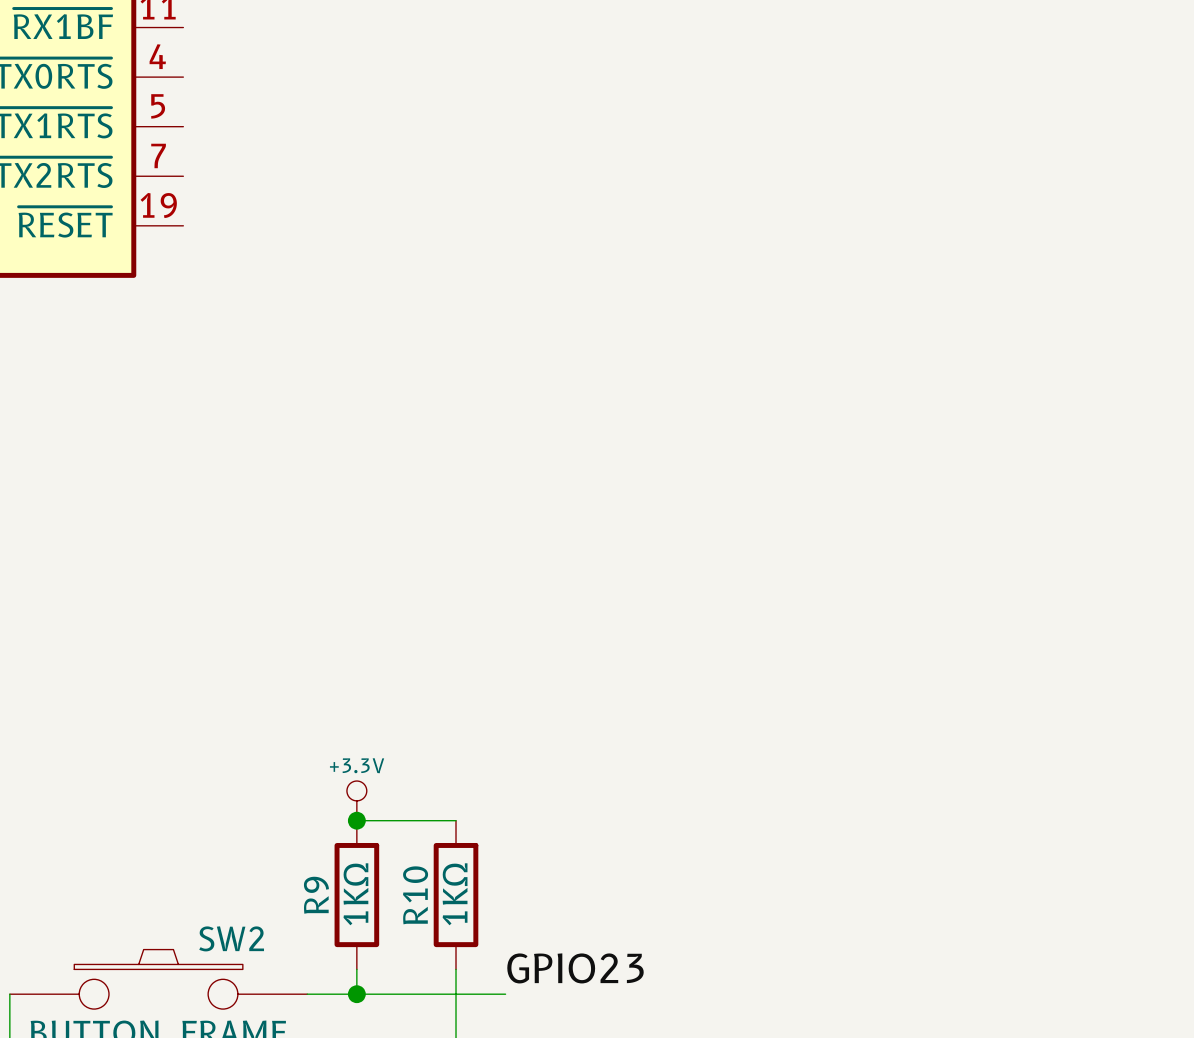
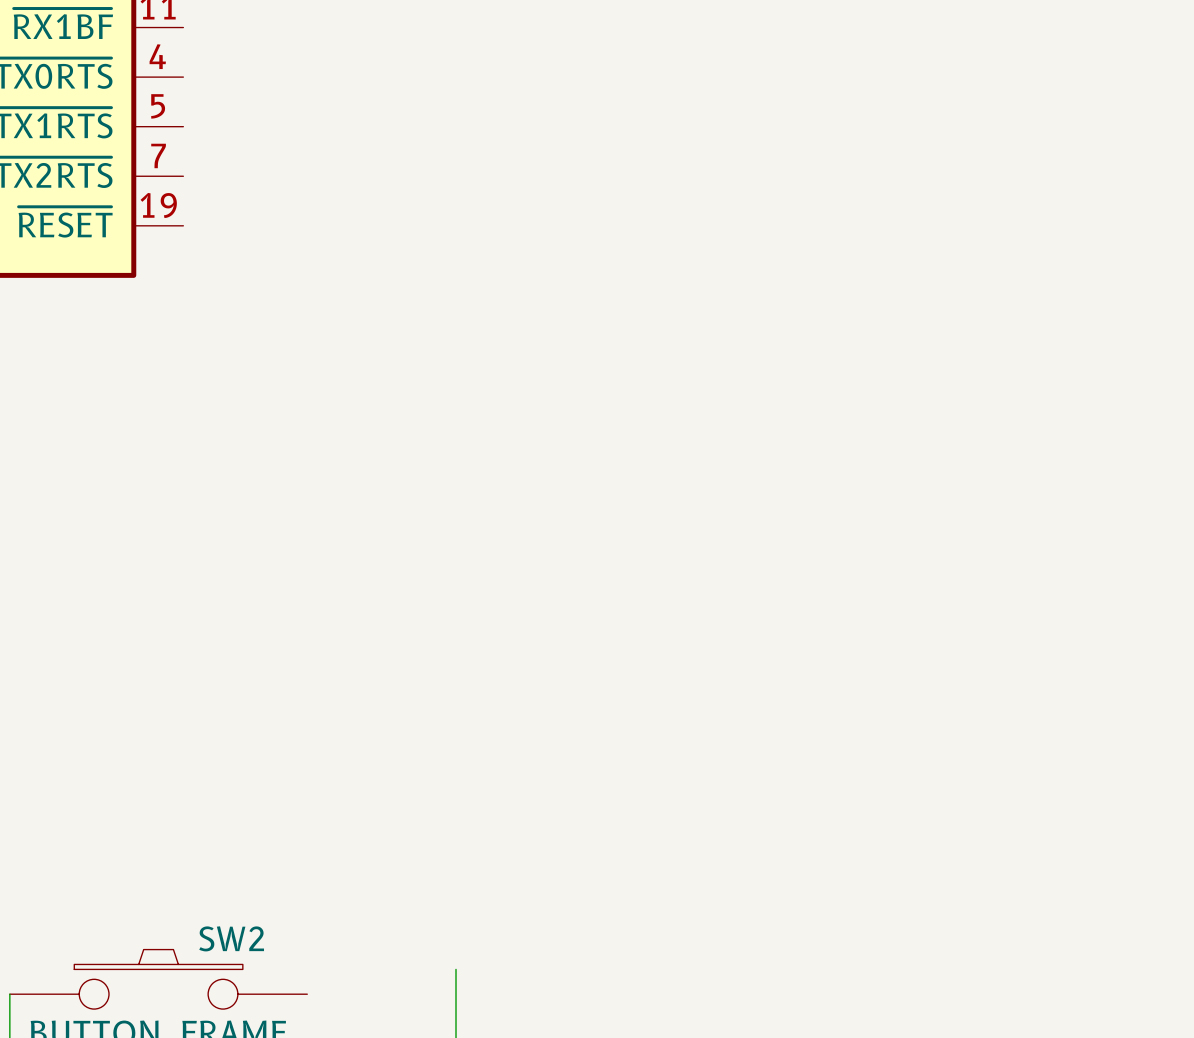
power symbol: +3.3V (356, 800) -> none
wire: (356, 820) (456, 820) -> none
junction: (356, 820) -> none
R9: 1KΩ (356, 895) -> none
R10: 1KΩ (456, 895) -> none
label: GPIO23 (575, 968) -> none
wire: (356, 969) (356, 994) -> none
wire: (307, 994) (505, 994) -> none
junction: (356, 994) -> none

